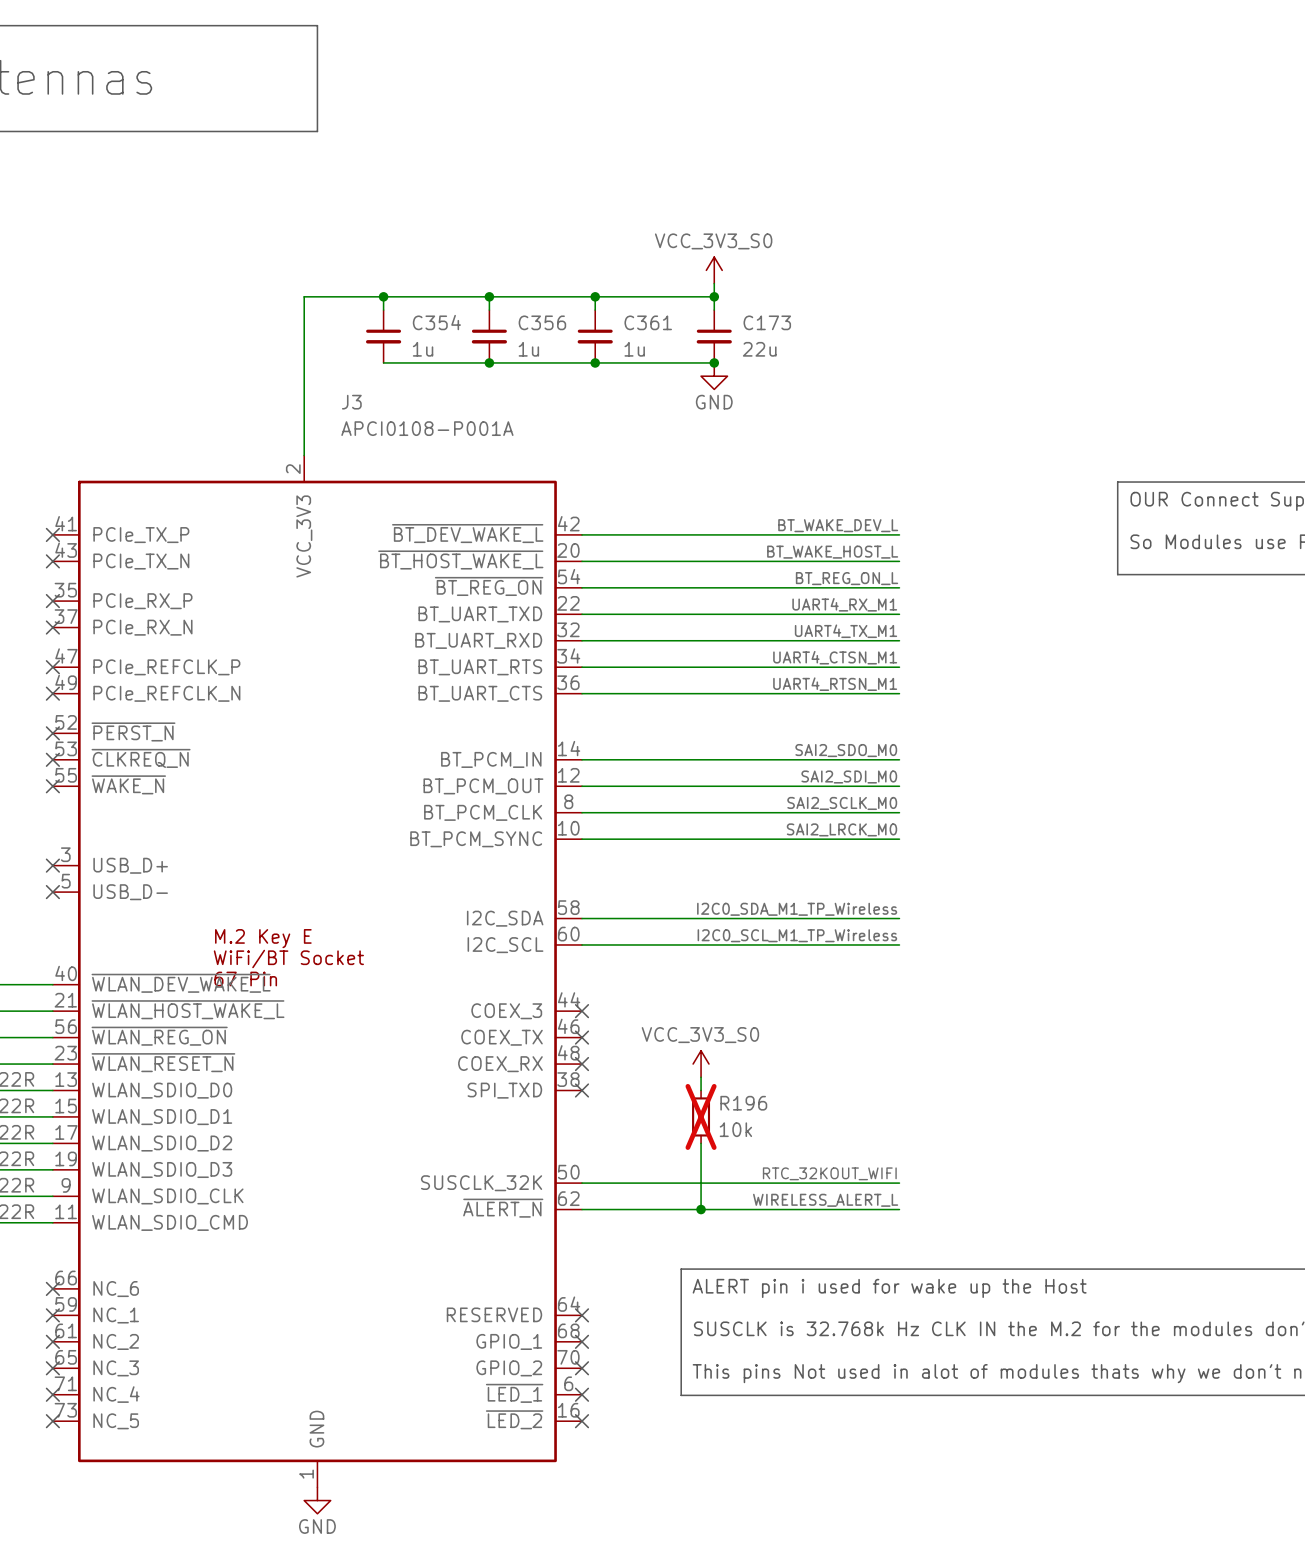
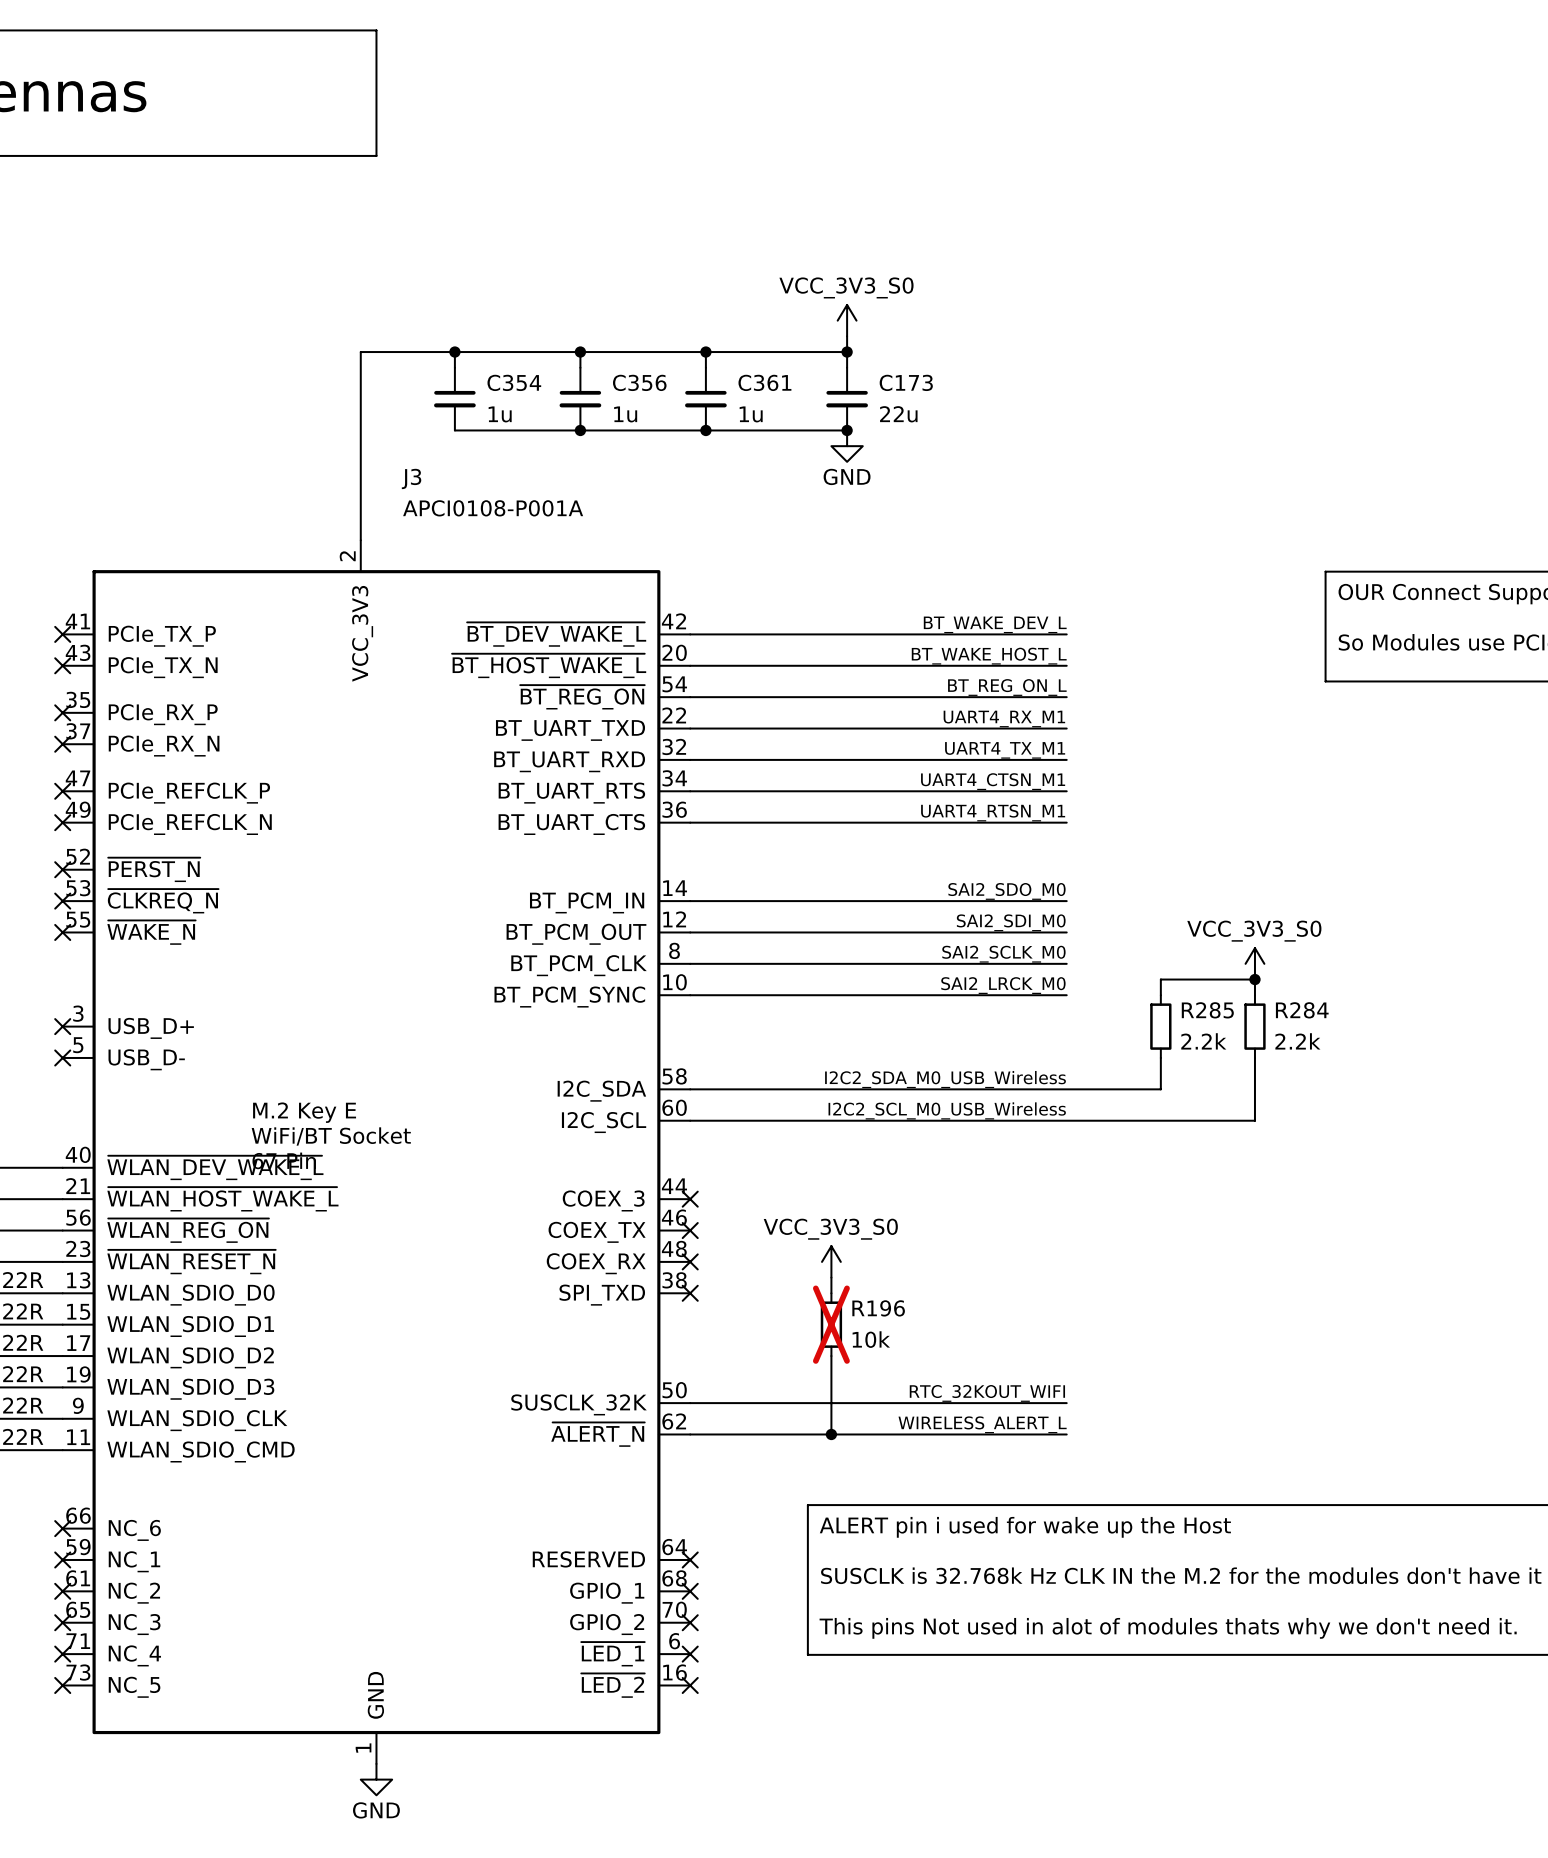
power symbol: none -> VCC_3V3_S0 (1254, 963)
junction: none -> (1254, 979)
wire: none -> (1160, 995) (1160, 979) (1254, 979) (1254, 995)
R285: none -> 2.2k (1160, 1026)
R284: none -> 2.2k (1254, 1026)
wire: none -> (1160, 1057) (1160, 1089) (1066, 1089)
wire: none -> (1254, 1057) (1254, 1120) (1066, 1120)
label: I2C0_SDA_M1_TP_Wireless (797, 909) -> I2C2_SDA_M0_USB_Wireless (945, 1079)
label: I2C0_SCL_M1_TP_Wireless (797, 935) -> I2C2_SCL_M0_USB_Wireless (947, 1110)

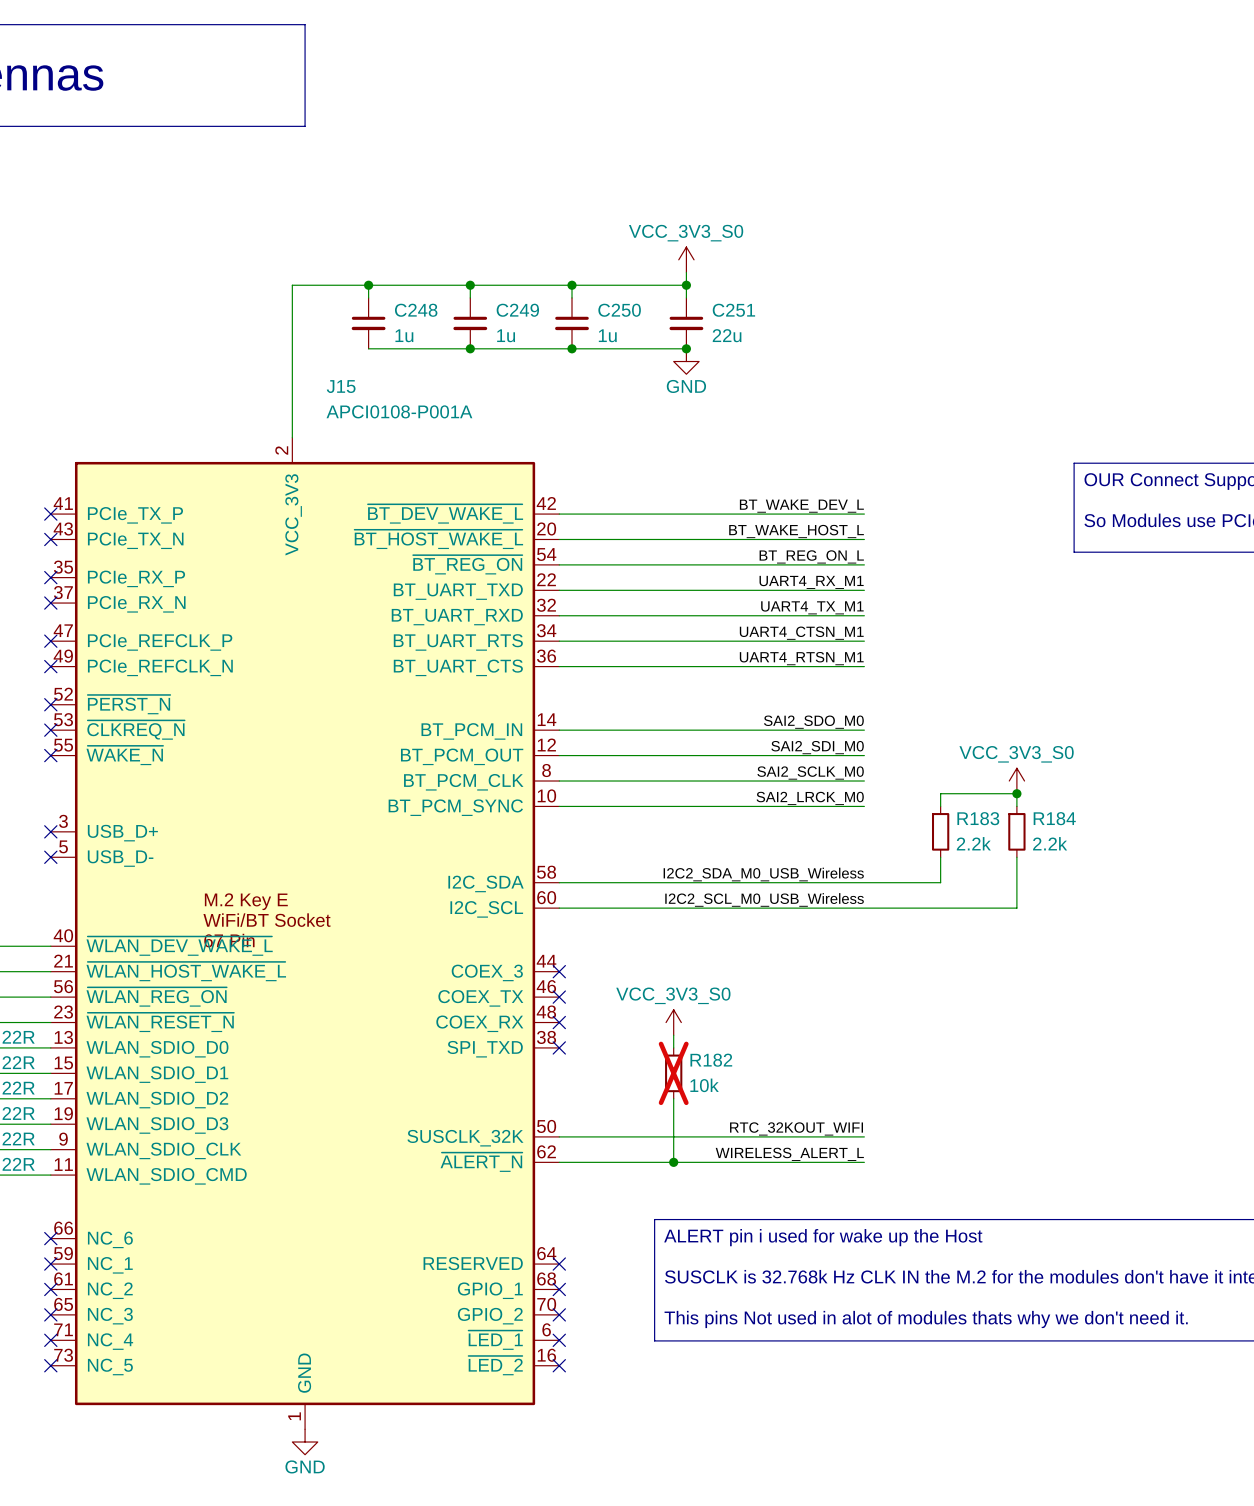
C354 name: C354 (514, 382) -> C248 (416, 310)
C356 name: C356 (639, 382) -> C249 (517, 310)
C361 name: C361 (764, 382) -> C250 (619, 310)
C173 name: C173 (906, 382) -> C251 (733, 310)
J3 name: J3 (411, 478) -> J15 (341, 386)
R285 name: R285 (1207, 1010) -> R183 (978, 818)
R284 name: R284 (1302, 1010) -> R184 (1054, 818)
R196 name: R196 (878, 1308) -> R182 (711, 1060)

